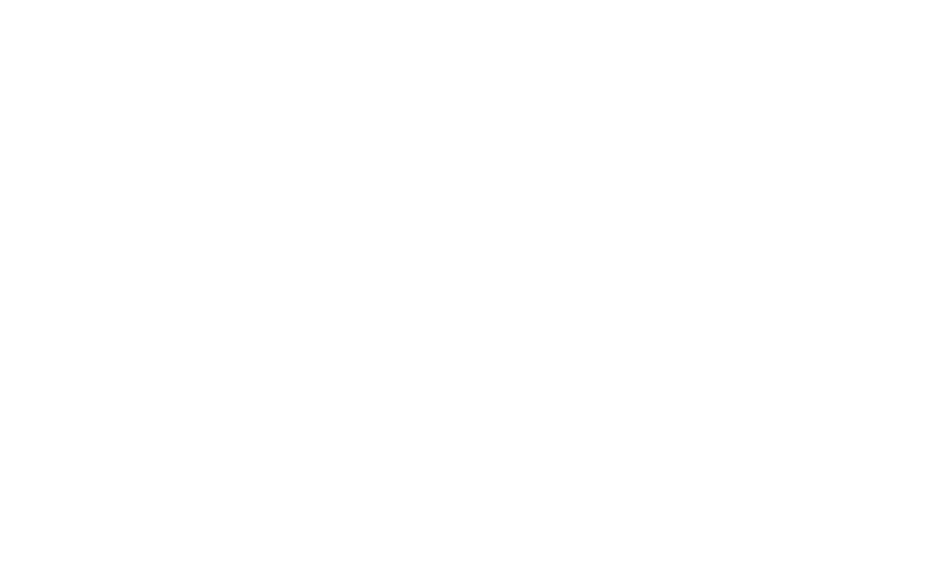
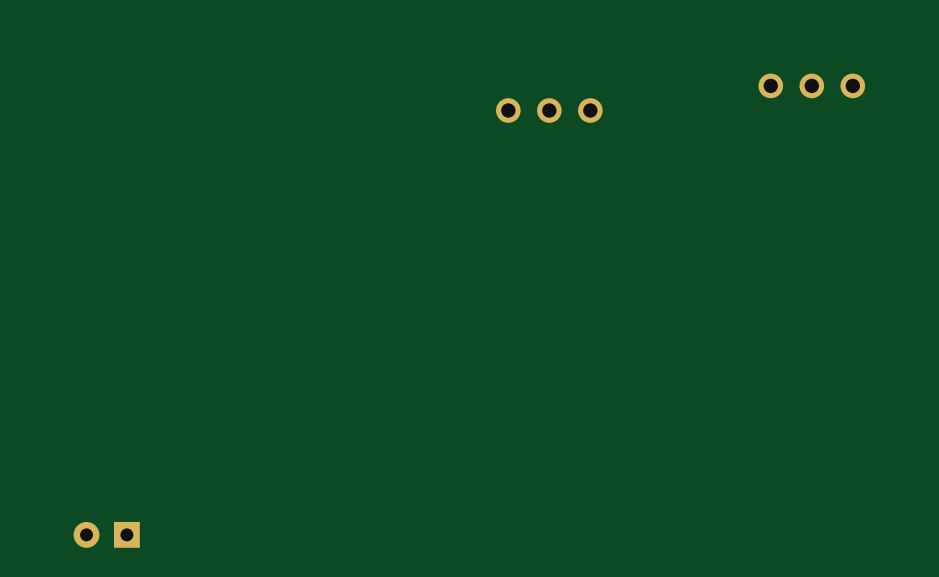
part: none -> (811, 85)
part: none -> (549, 110)
part: none -> (106, 534)

